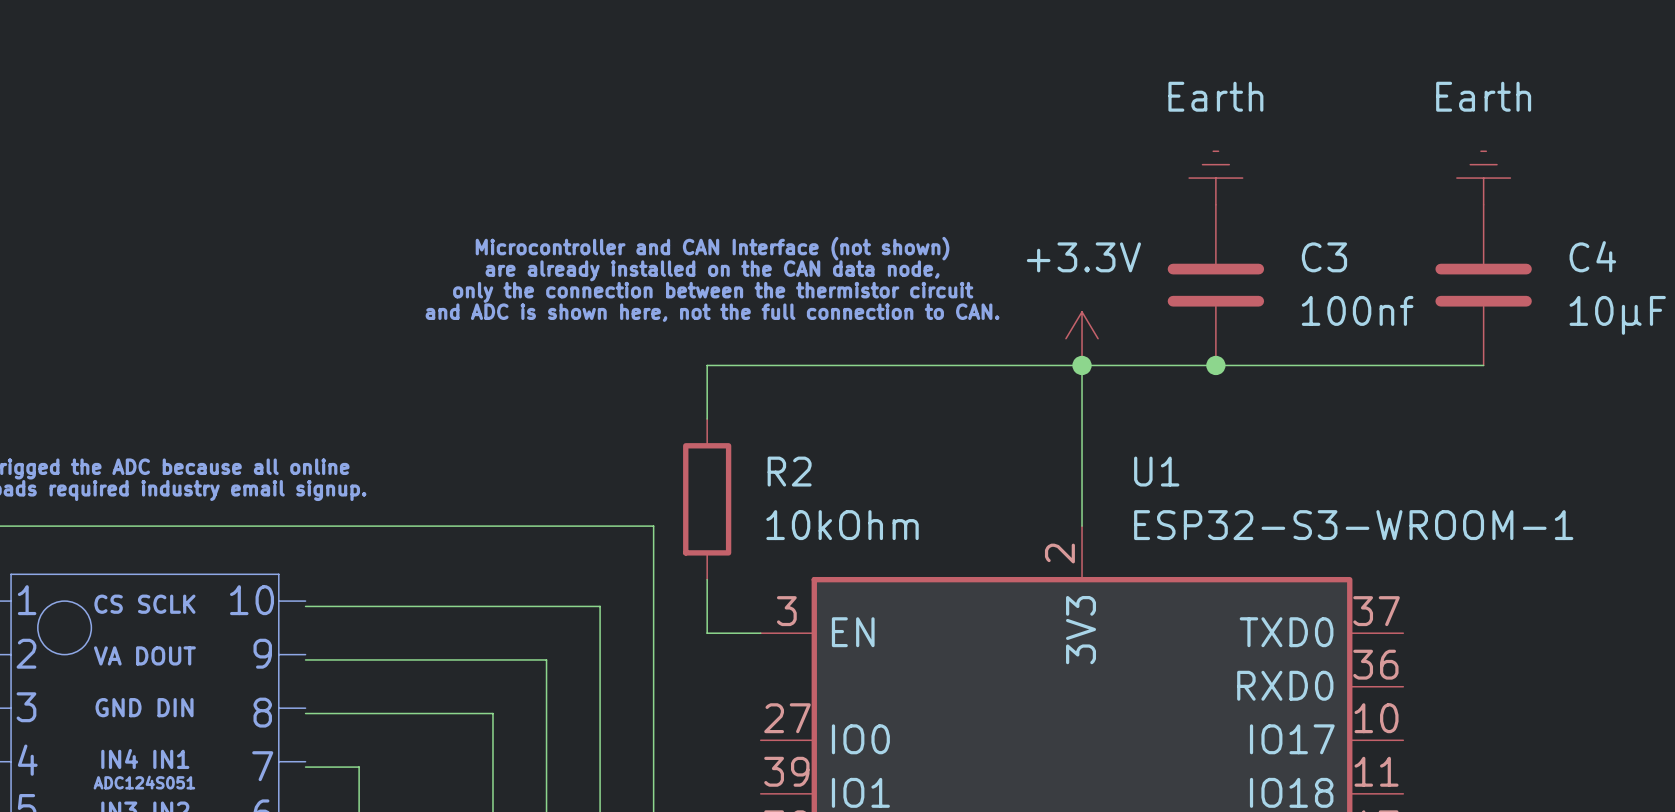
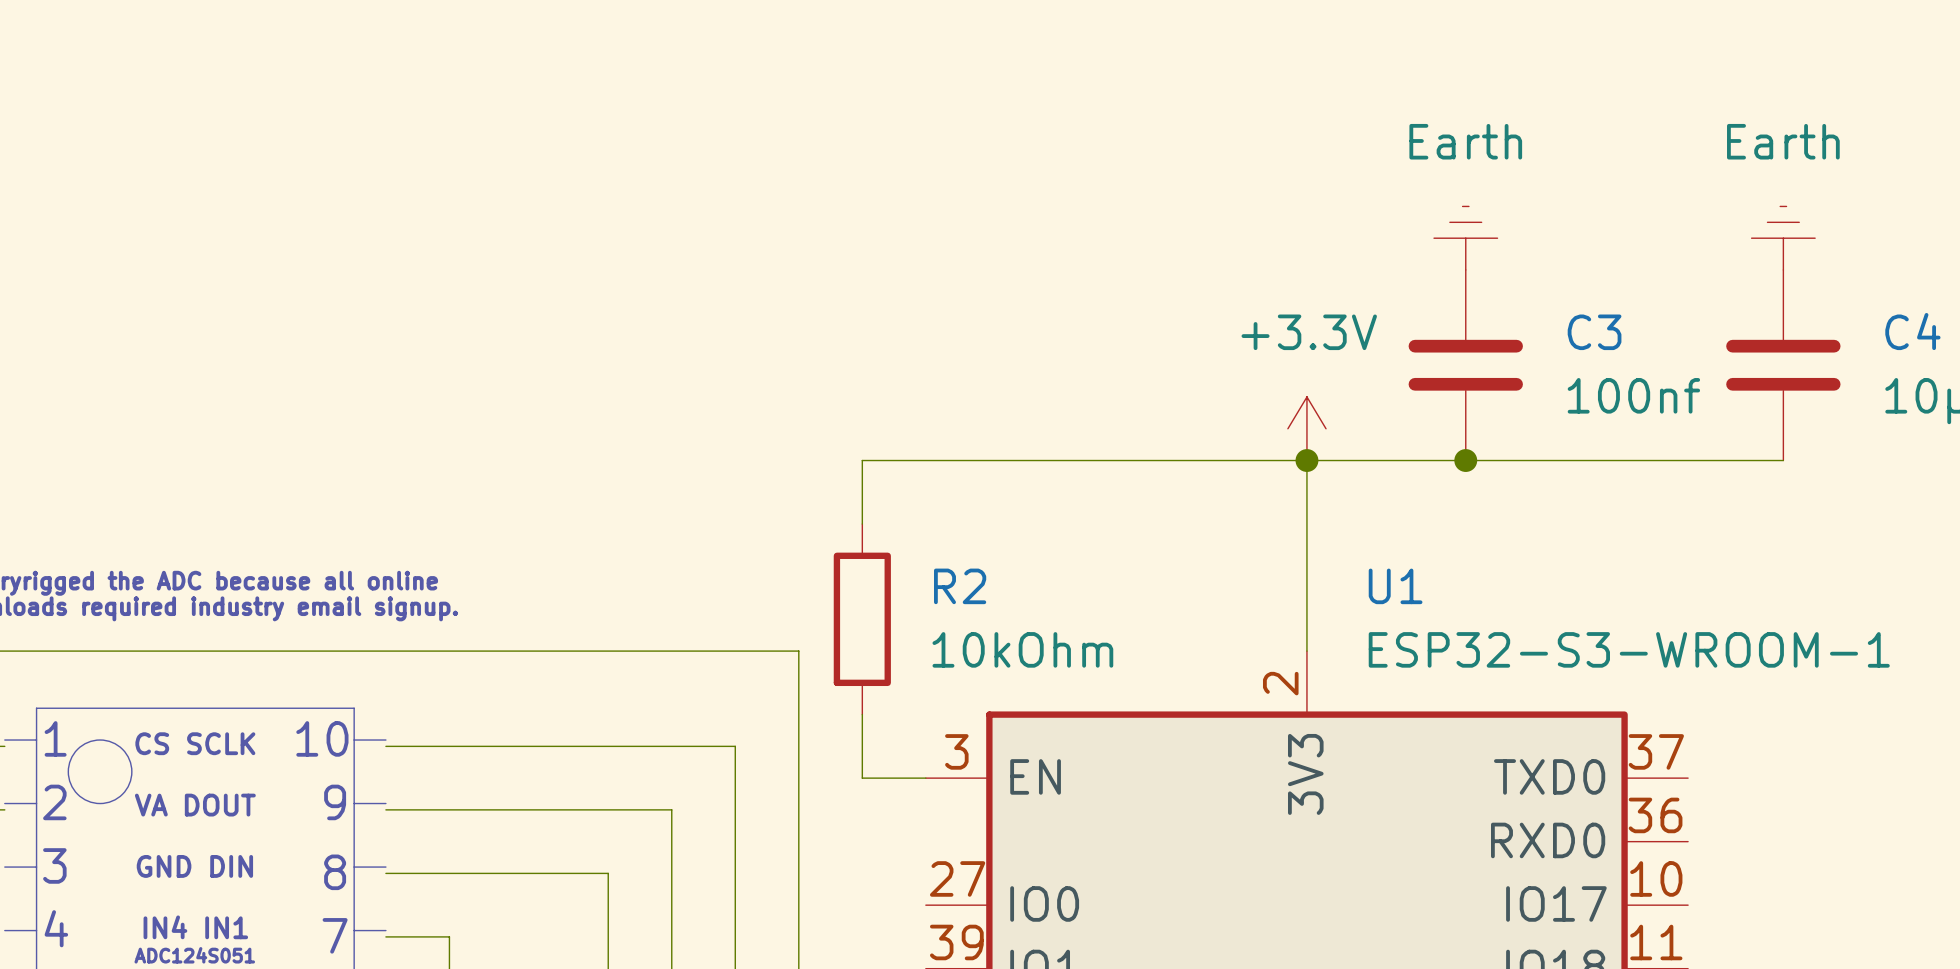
text: Microcontroller and CAN Interface (not shown) (712, 248) -> none
text: are already installed on the CAN data node, (712, 270) -> none
text: only the connection between the thermistor circuit (713, 292) -> none
text: and ADC is shown here, not the full connection to CAN. (712, 312) -> none

